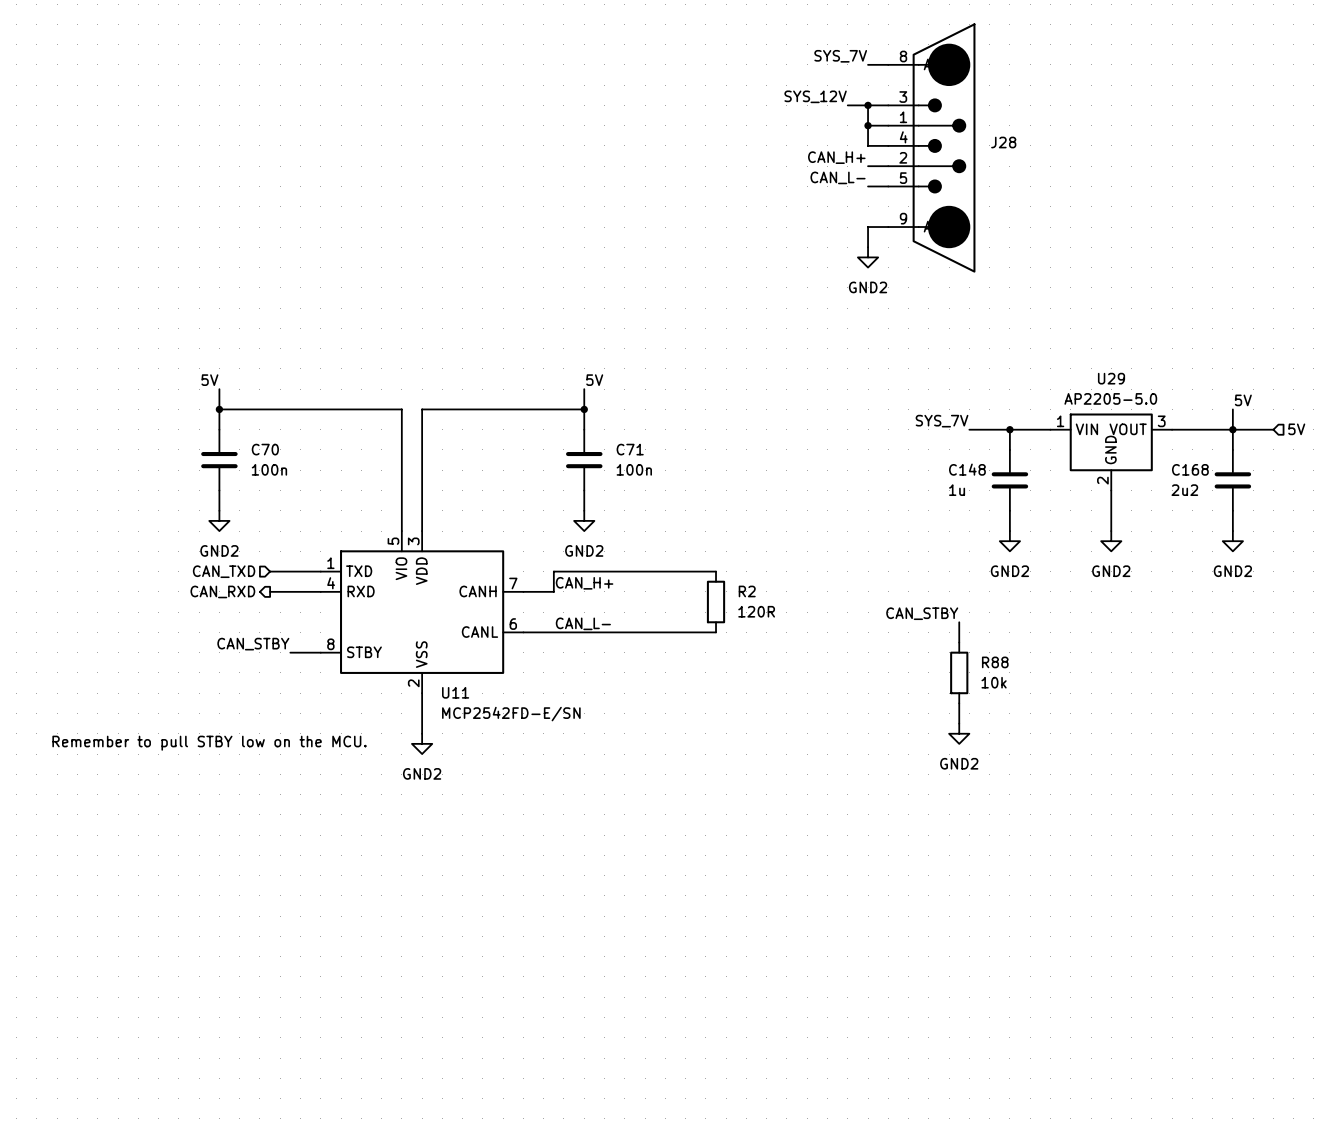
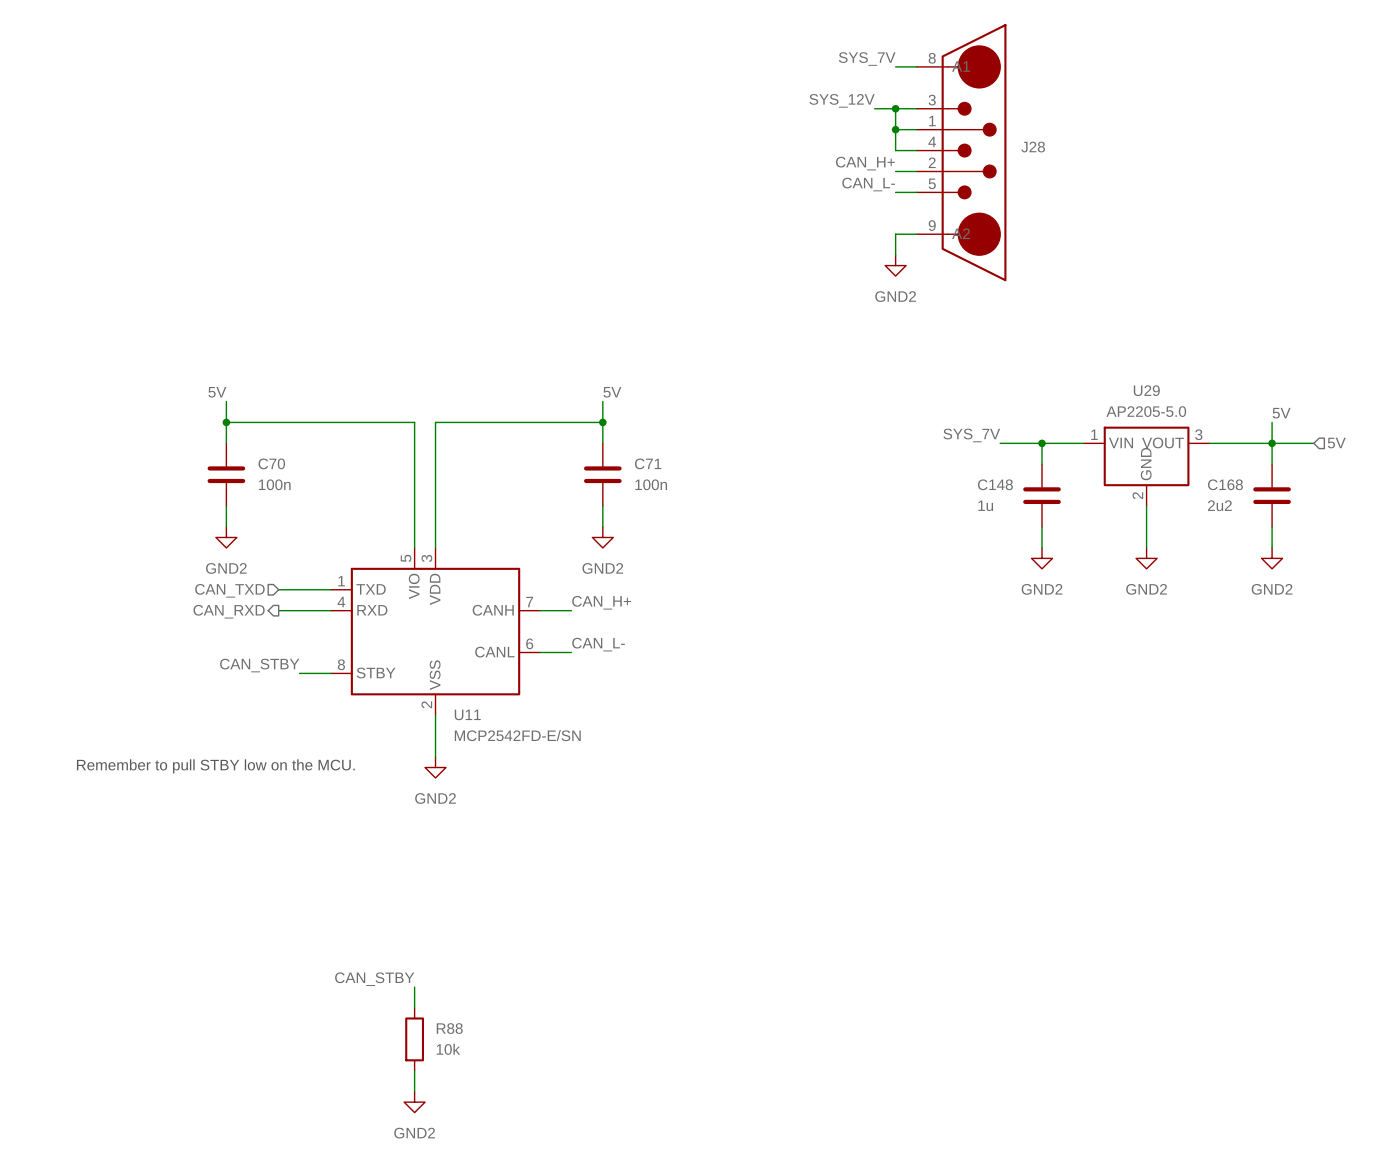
wire: (716, 571) (553, 571) (553, 591) -> none
R2: 120R (716, 602) -> none
label: CAN_STBY (922, 613) -> none
wire: (959, 622) (959, 642) -> none
wire: (553, 632) (716, 632) -> none
R88 position: (959, 672) -> (414, 1039)
wire: (959, 703) (959, 723) -> none
power symbol: GND2 (959, 733) -> none
label: none -> CAN_STBY (374, 979)
wire: none -> (414, 987) (414, 1008)
wire: none -> (414, 1070) (414, 1091)
power symbol: none -> GND2 (414, 1102)

